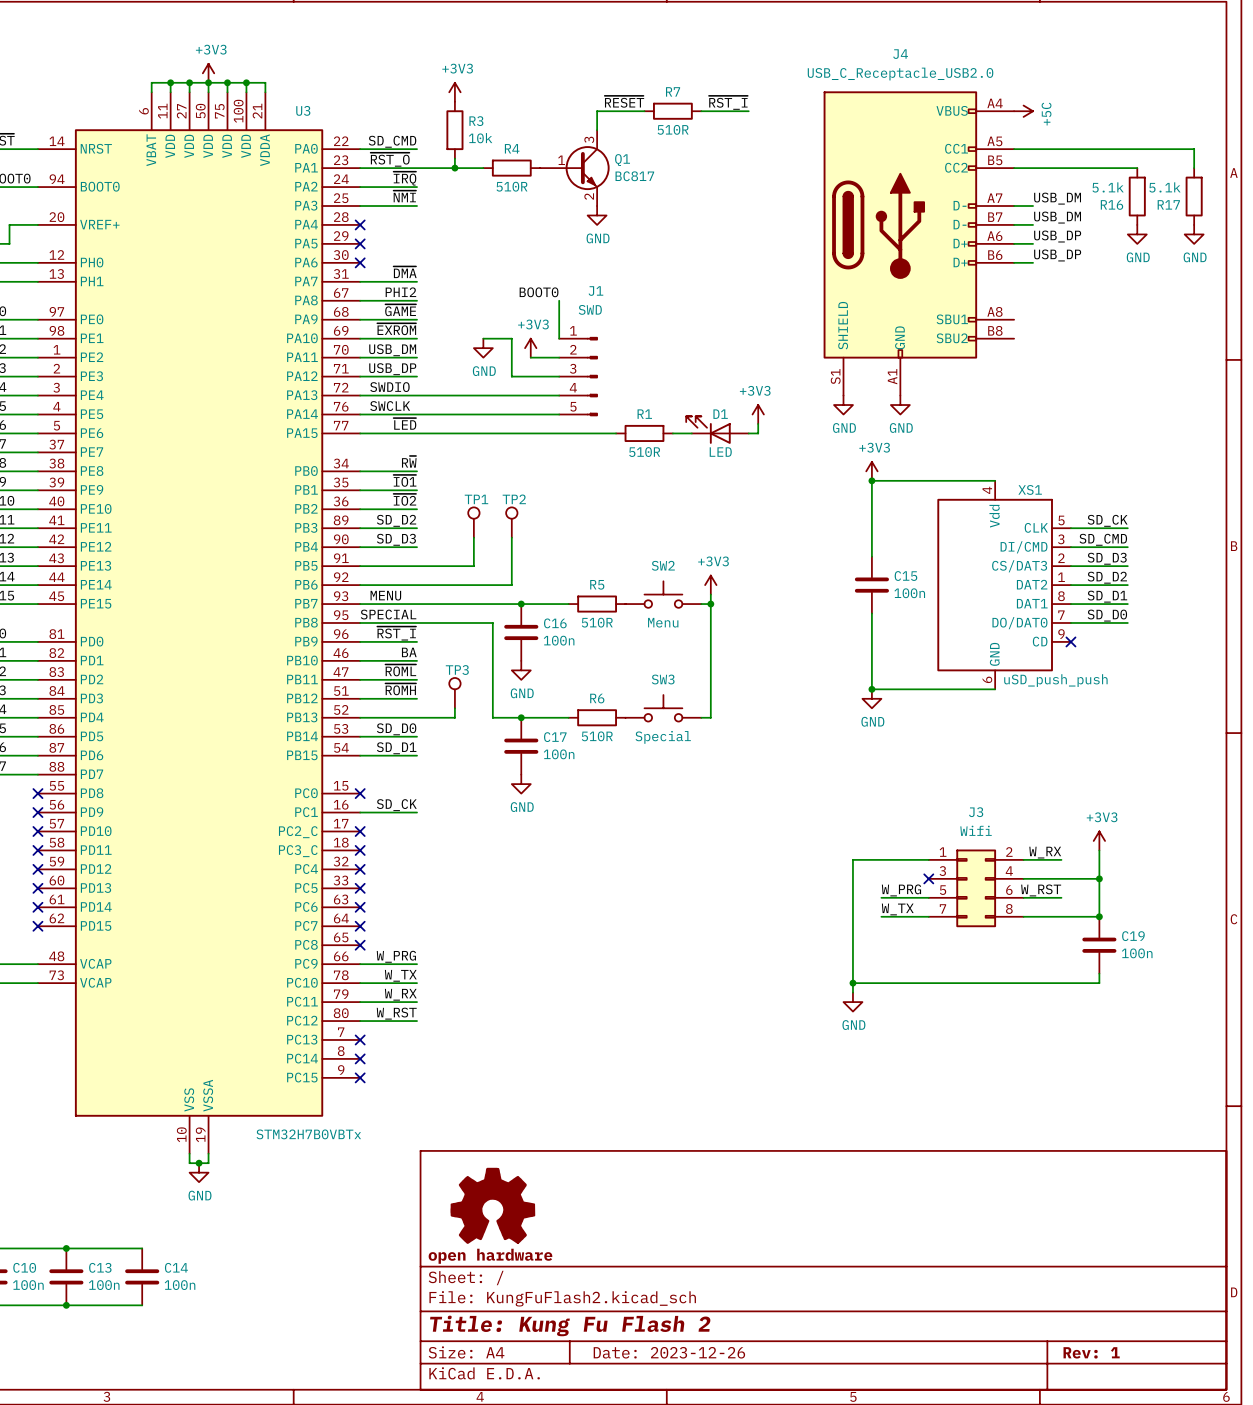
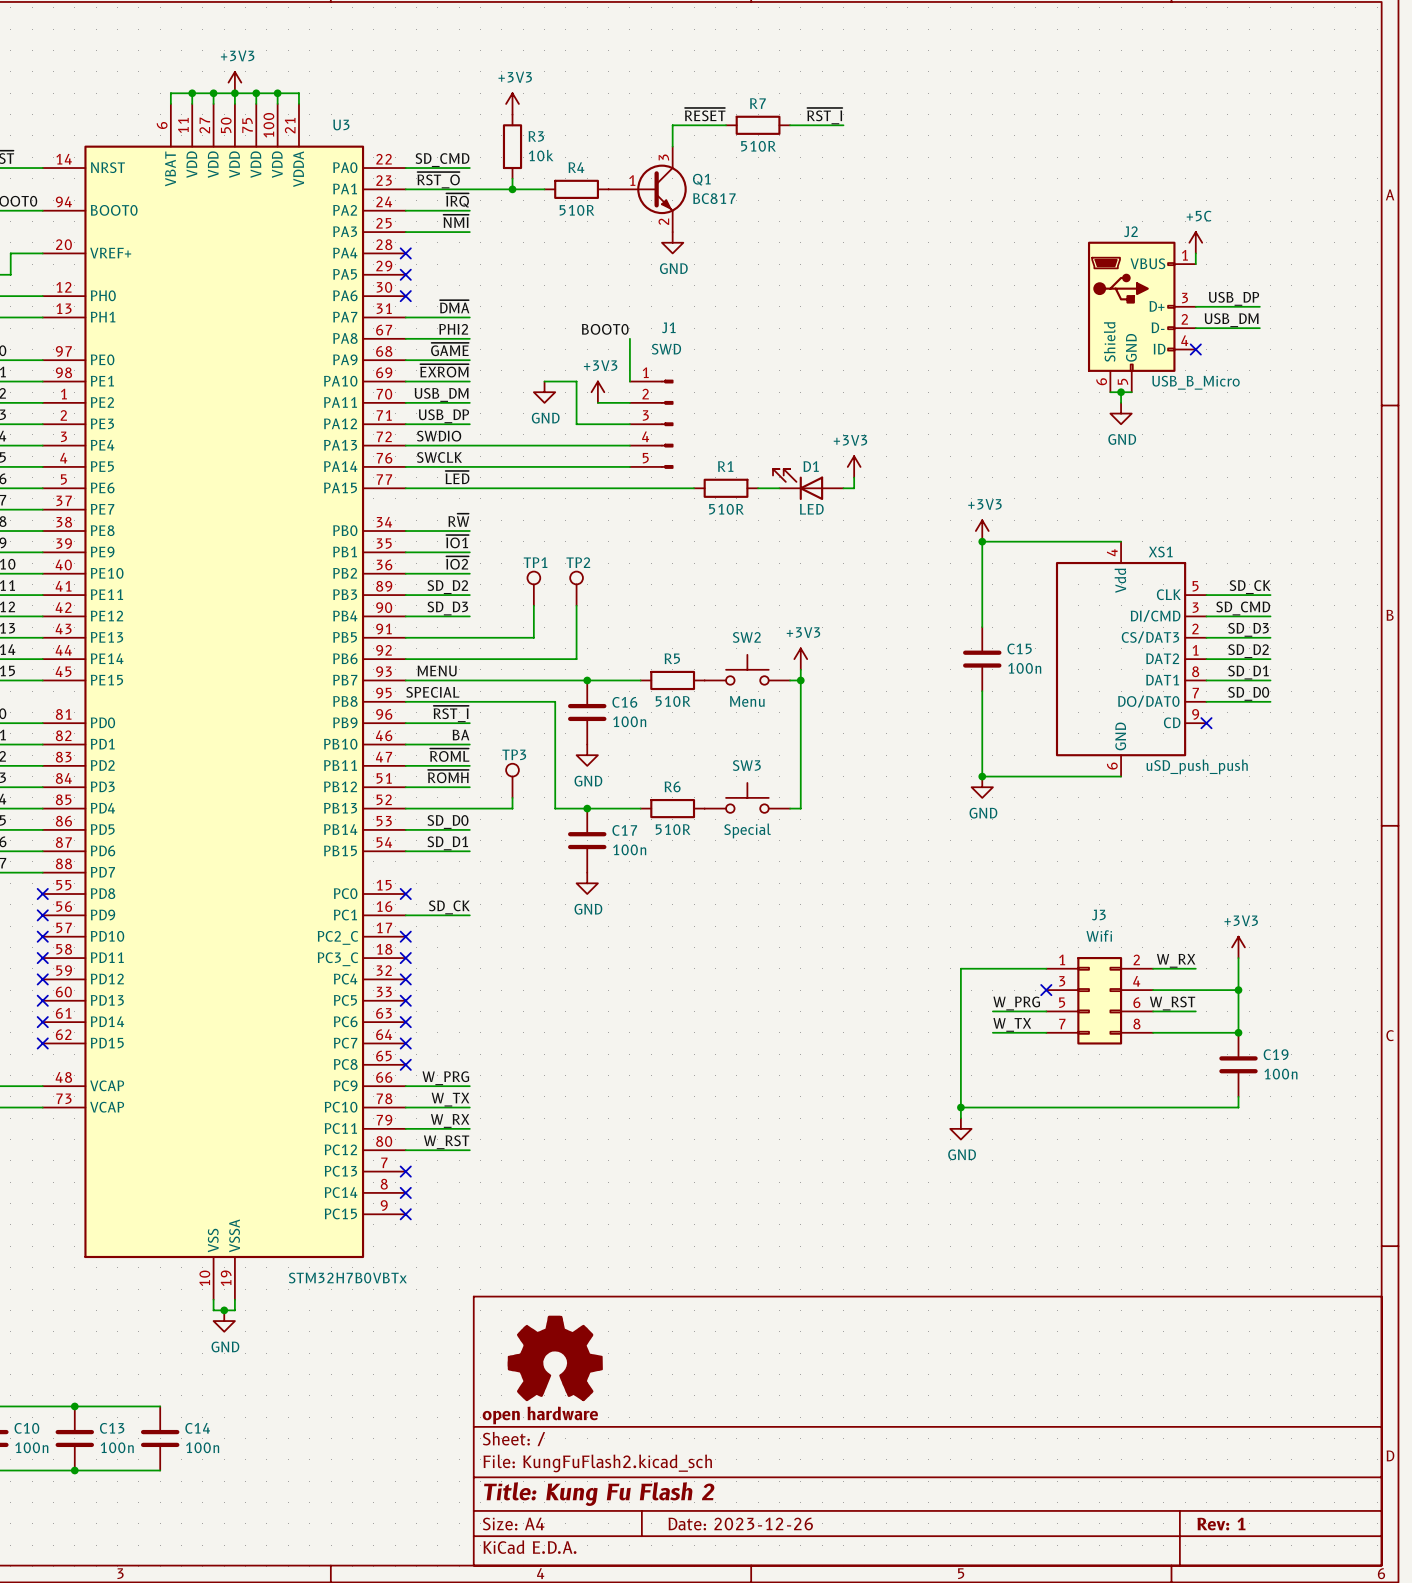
power symbol rotation: 0° (1023, 111) -> 90° counterclockwise (1195, 242)
power symbol position: +5C (1023, 111) -> +5C (1195, 242)
wire: (1014, 149) (1194, 149) (1194, 168) -> none
wire: (1014, 168) (1137, 168) -> none
R16: 5.1k (1137, 196) -> none
R17: 5.1k (1194, 196) -> none
label: USB_DM (1057, 198) -> none
wire: (1014, 206) (1033, 206) -> none
label: USB_DM (1057, 217) -> none
wire: none -> (1195, 253) (1195, 264)
power symbol: GND (1137, 234) -> none
power symbol: GND (1194, 234) -> none
label: USB_DP (1057, 236) -> none
J4: USB_C_Receptacle_USB2.0 (918, 243) -> none
label position: USB_DP (1057, 255) -> USB_DP (1234, 298)
wire: none -> (1195, 306) (1259, 306)
J2: none -> USB_B_Micro (1141, 316)
label: none -> USB_DM (1231, 320)
wire: none -> (1195, 328) (1259, 328)
no-connect mark: none -> (1195, 349)
wire: none -> (1121, 392) (1121, 402)
junction: none -> (1121, 392)
power symbol: none -> GND (1121, 413)
power symbol: GND (843, 405) -> none
power symbol: GND (900, 405) -> none

